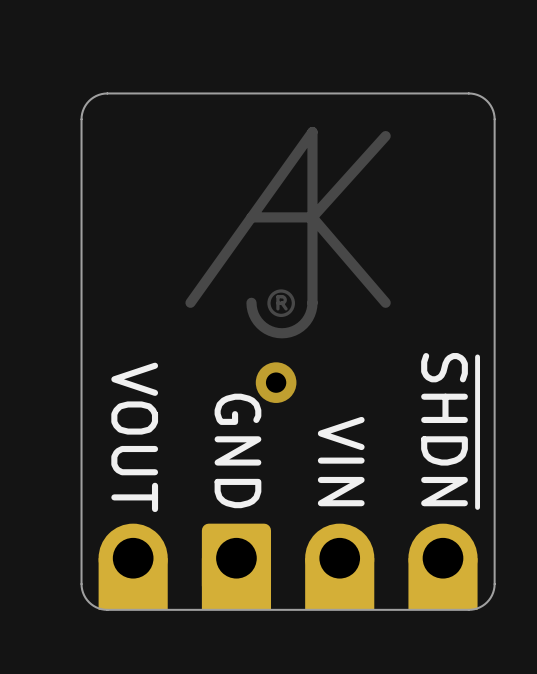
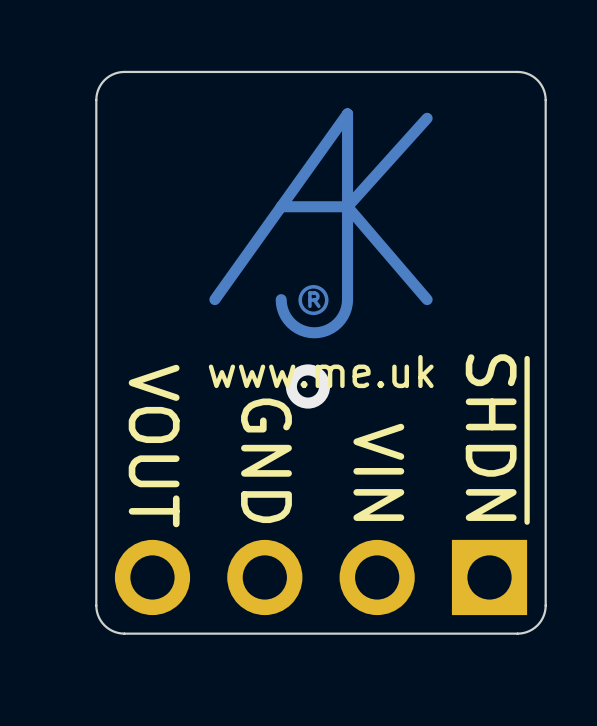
drawing shape: [185, 126, 391, 339] -> [208, 108, 434, 389]
part footprint: [98, 523, 478, 610] -> [114, 539, 528, 616]

